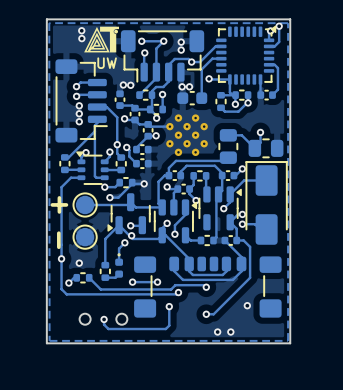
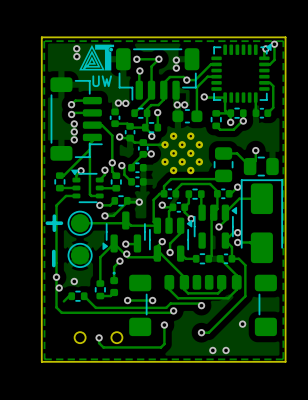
via position: (68, 283) -> (59, 288)

